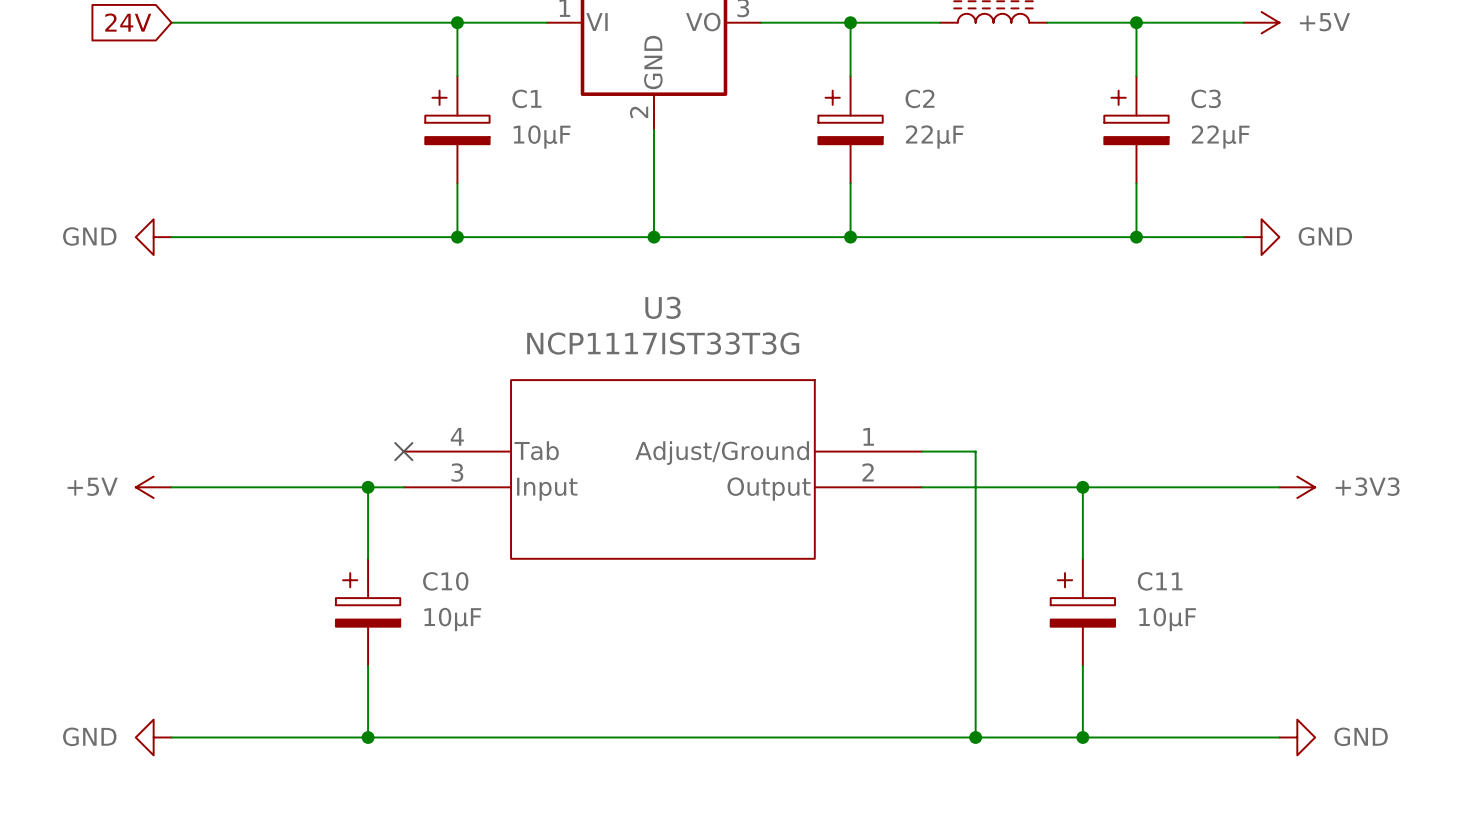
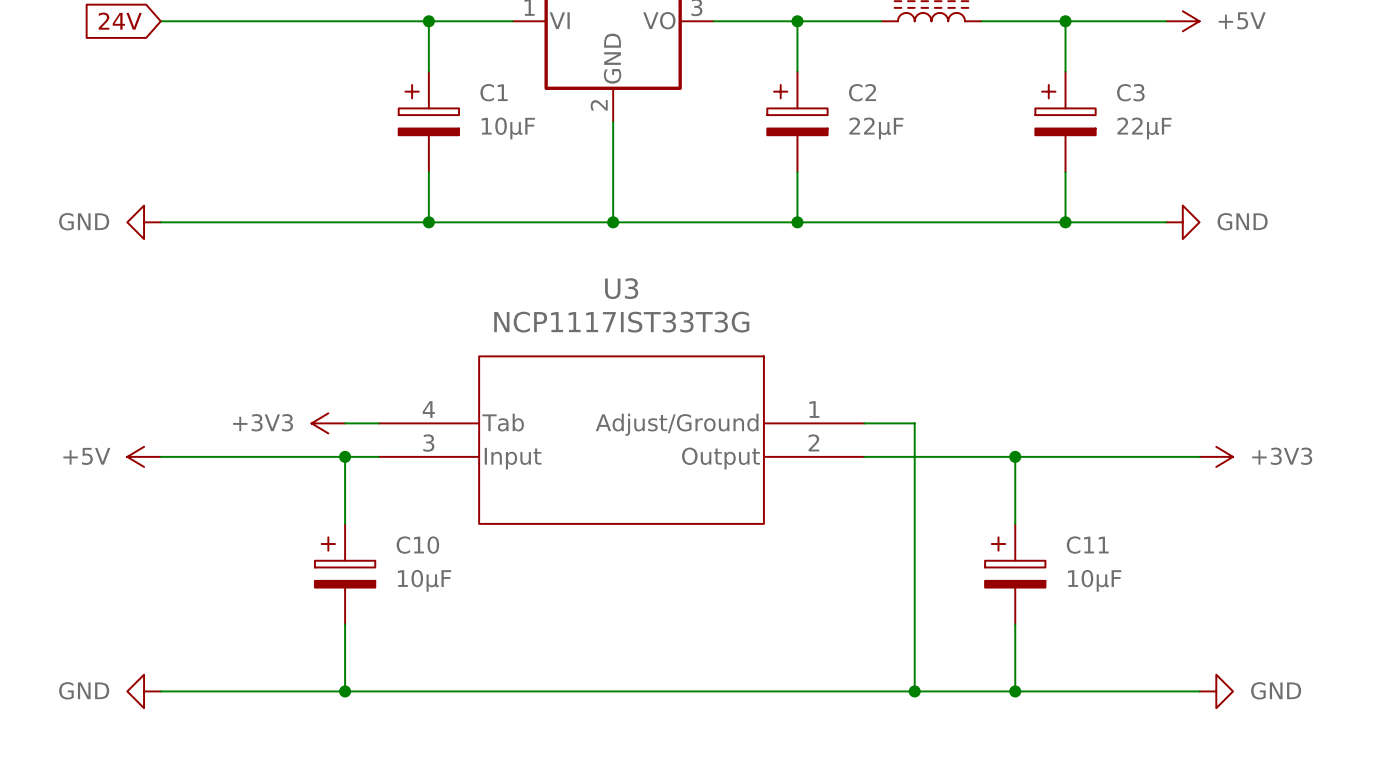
power symbol: none -> +3V3 (328, 423)
wire: none -> (345, 423) (378, 423)
no-connect mark: (403, 451) -> none

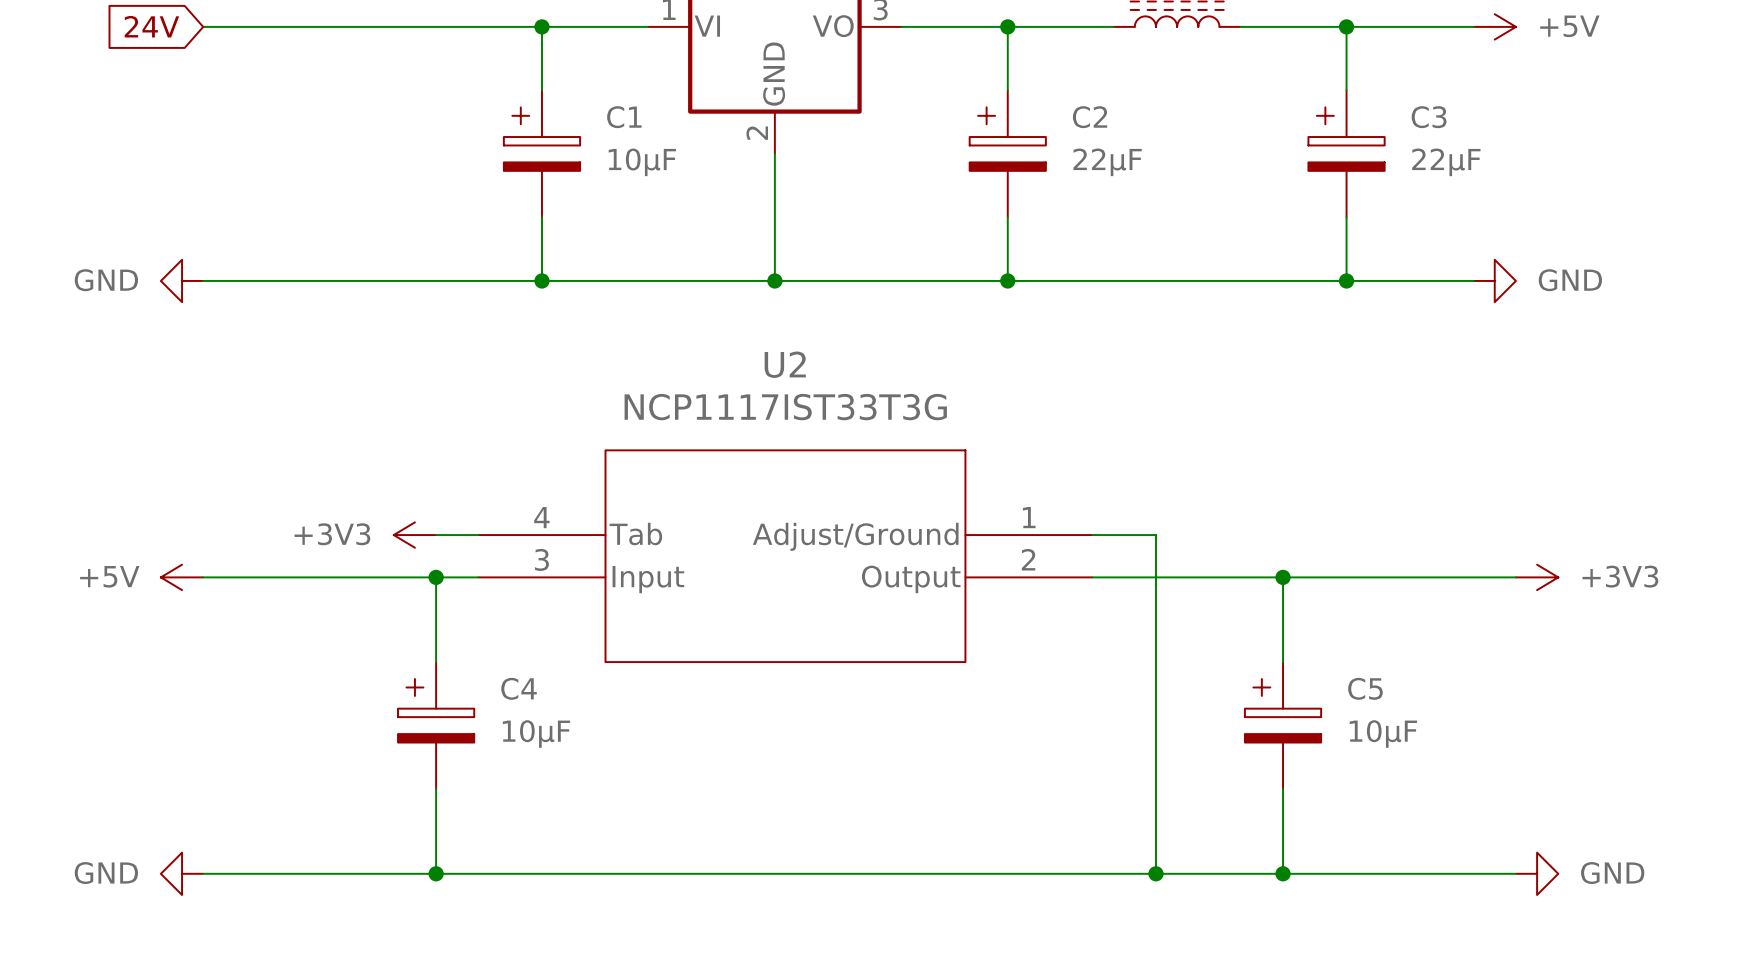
U3 name: U3 (621, 288) -> U2 (785, 364)
C10 name: C10 (417, 545) -> C4 (519, 688)
C11 name: C11 (1087, 545) -> C5 (1365, 688)

